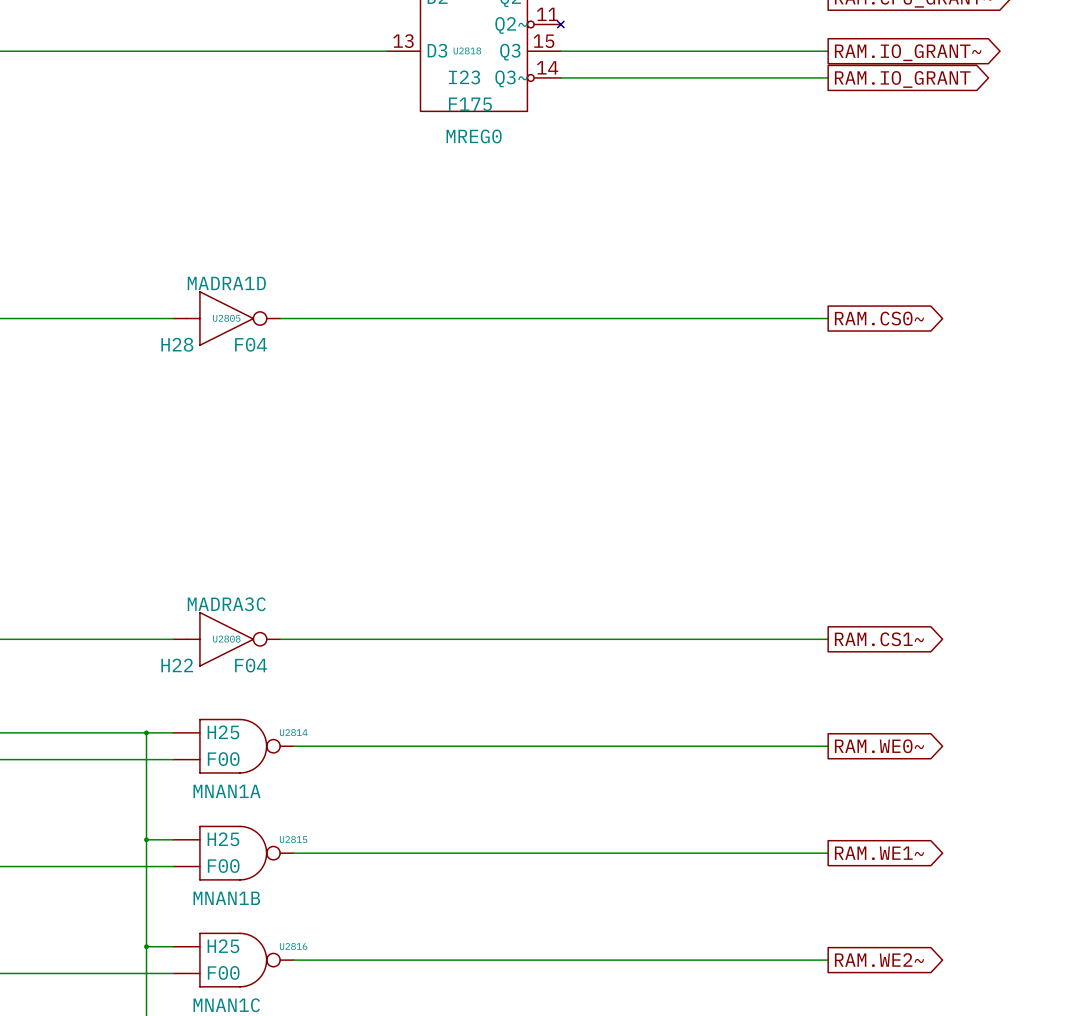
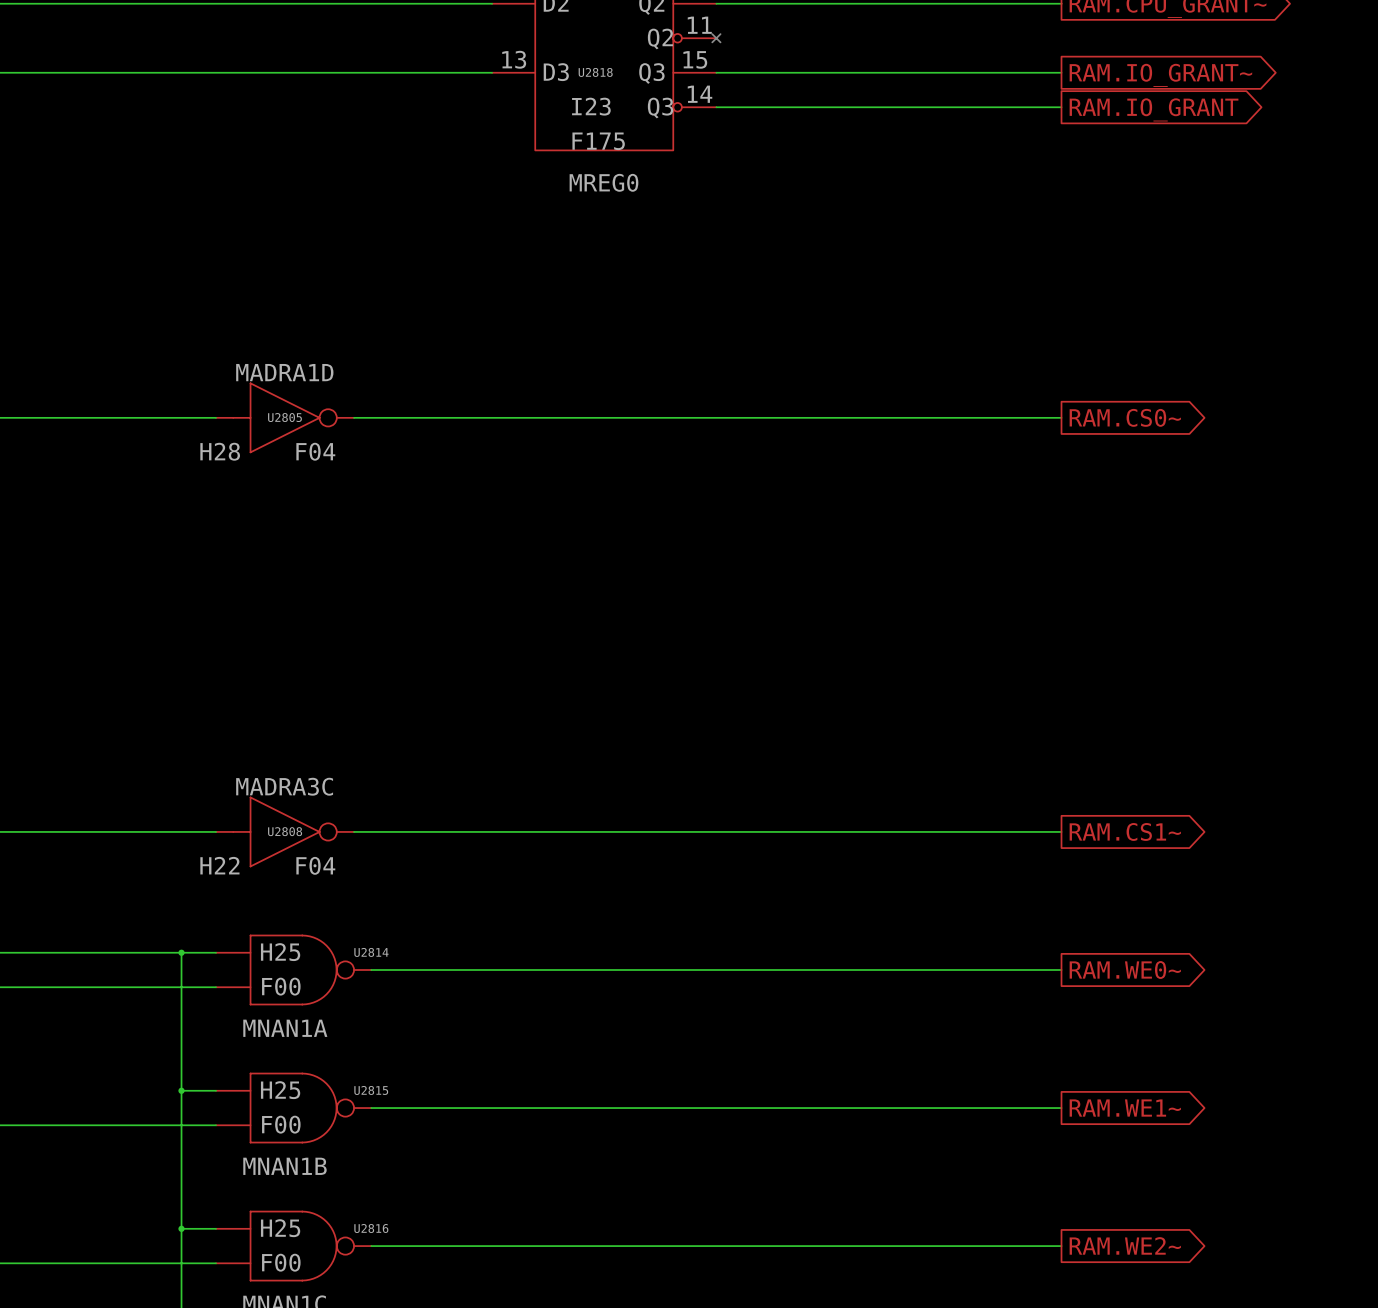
U2818 pin name: Q2~ (511, 25) -> Q2 (660, 39)
U2818 pin name: Q3~ (511, 78) -> Q3 (660, 108)

